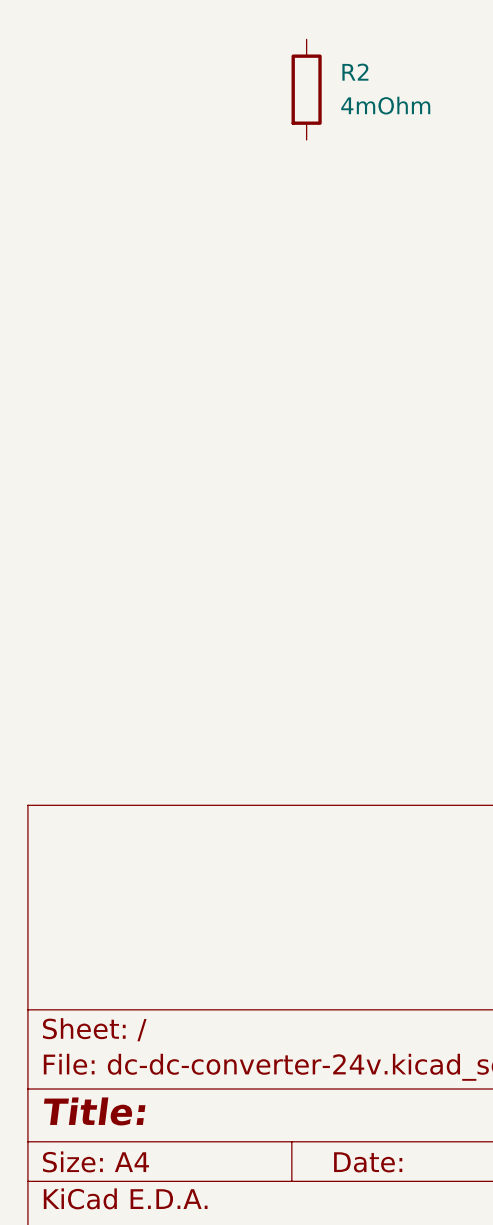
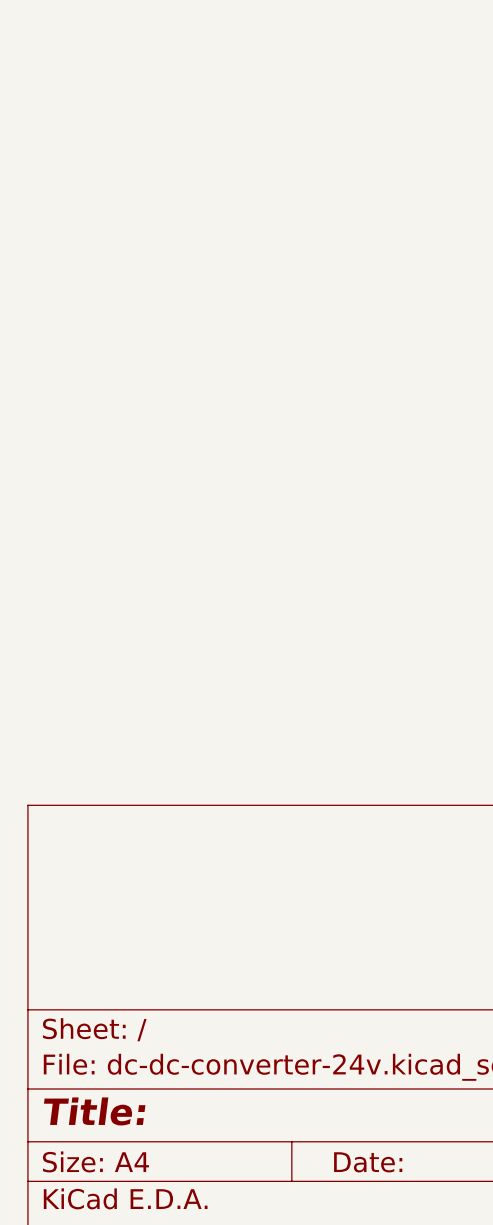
R2: 4mOhm (306, 89) -> none

